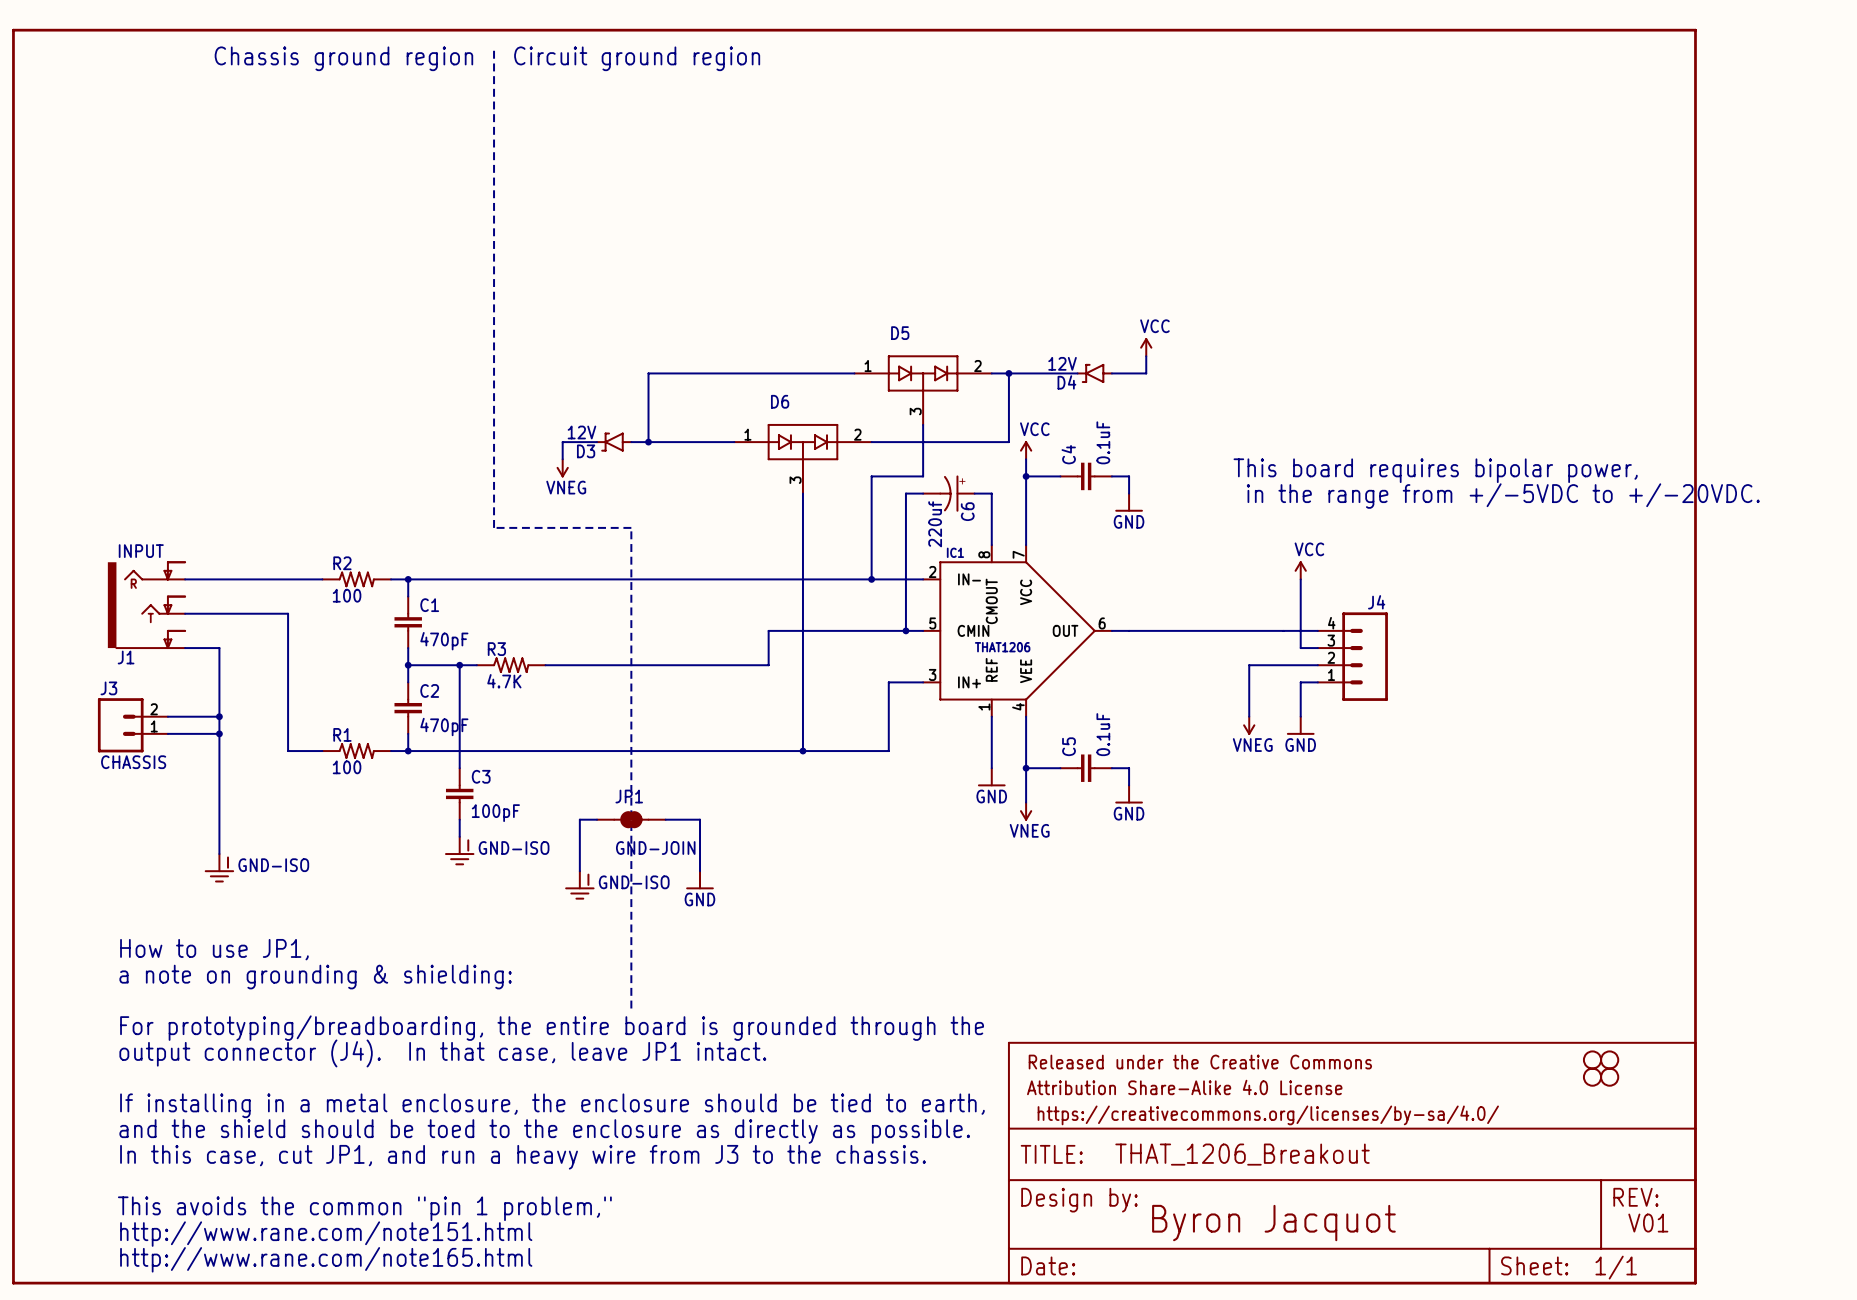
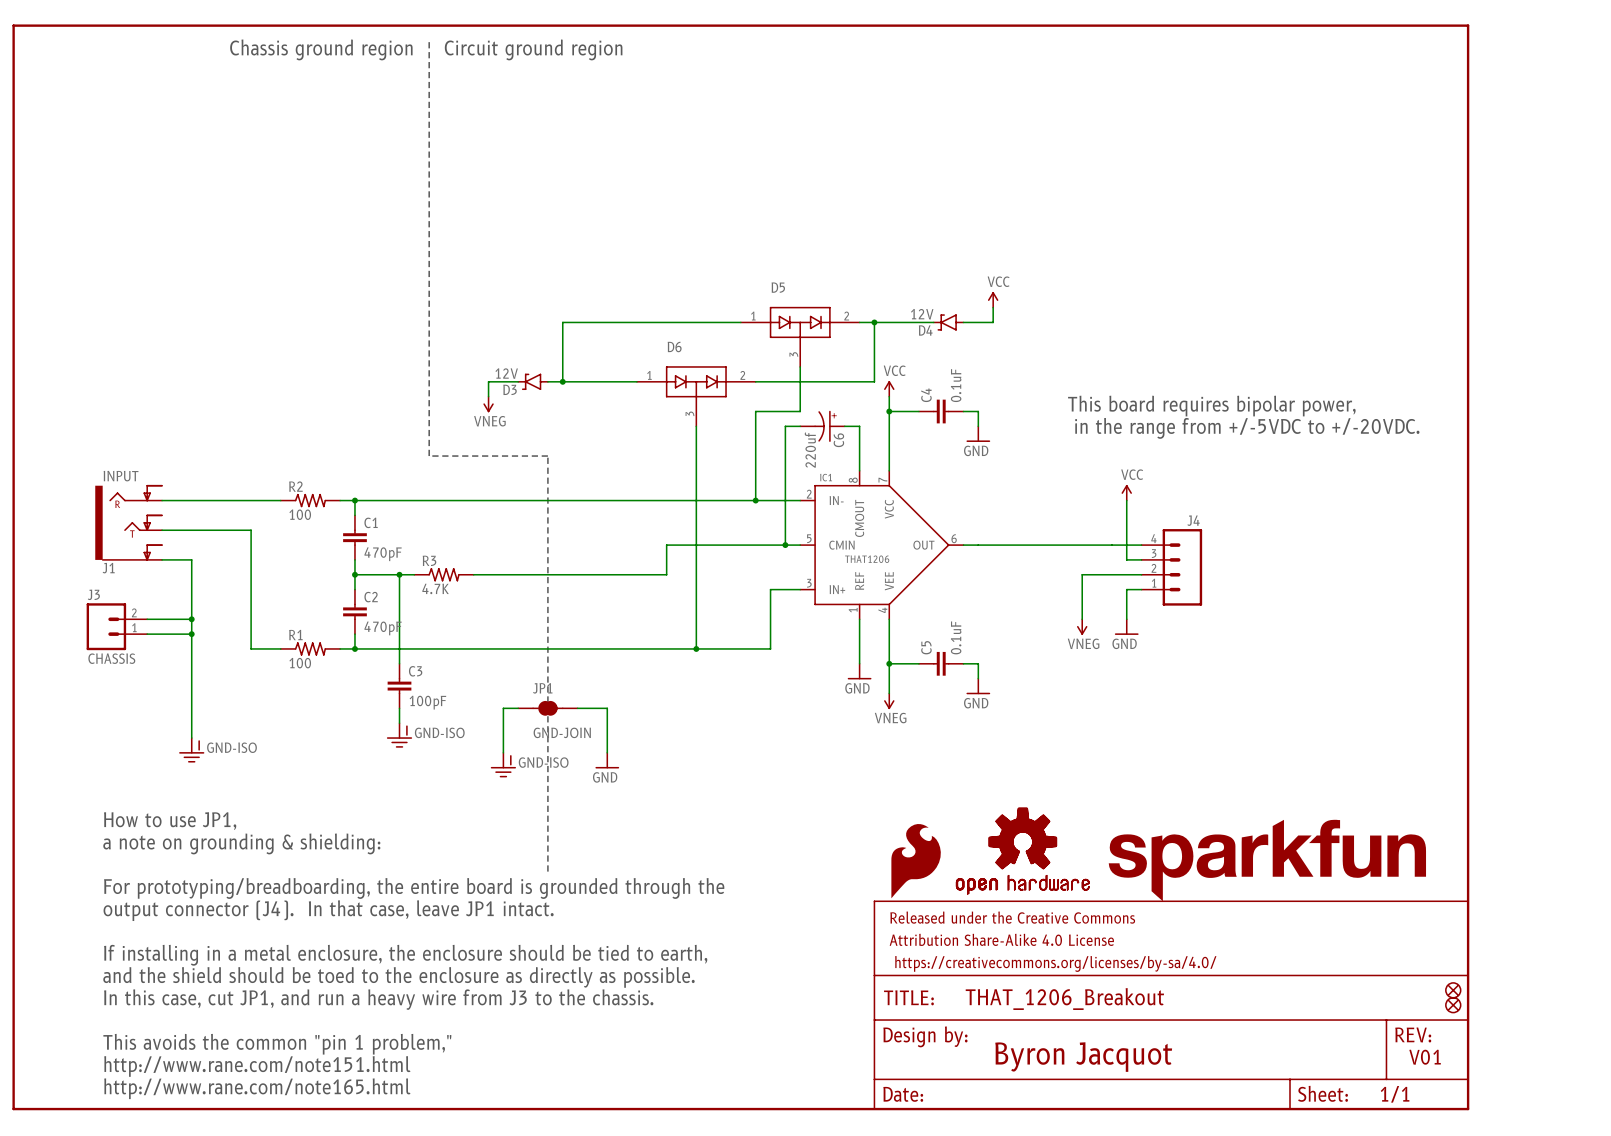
part: none -> (1022, 851)
part: none -> (1267, 860)
part: none -> (916, 861)
part: (1592, 1059) -> none
part: (1609, 1059) -> none
part: (1592, 1077) -> none
part: (1609, 1077) -> none
part: none -> (1453, 990)
part: none -> (1453, 1005)

